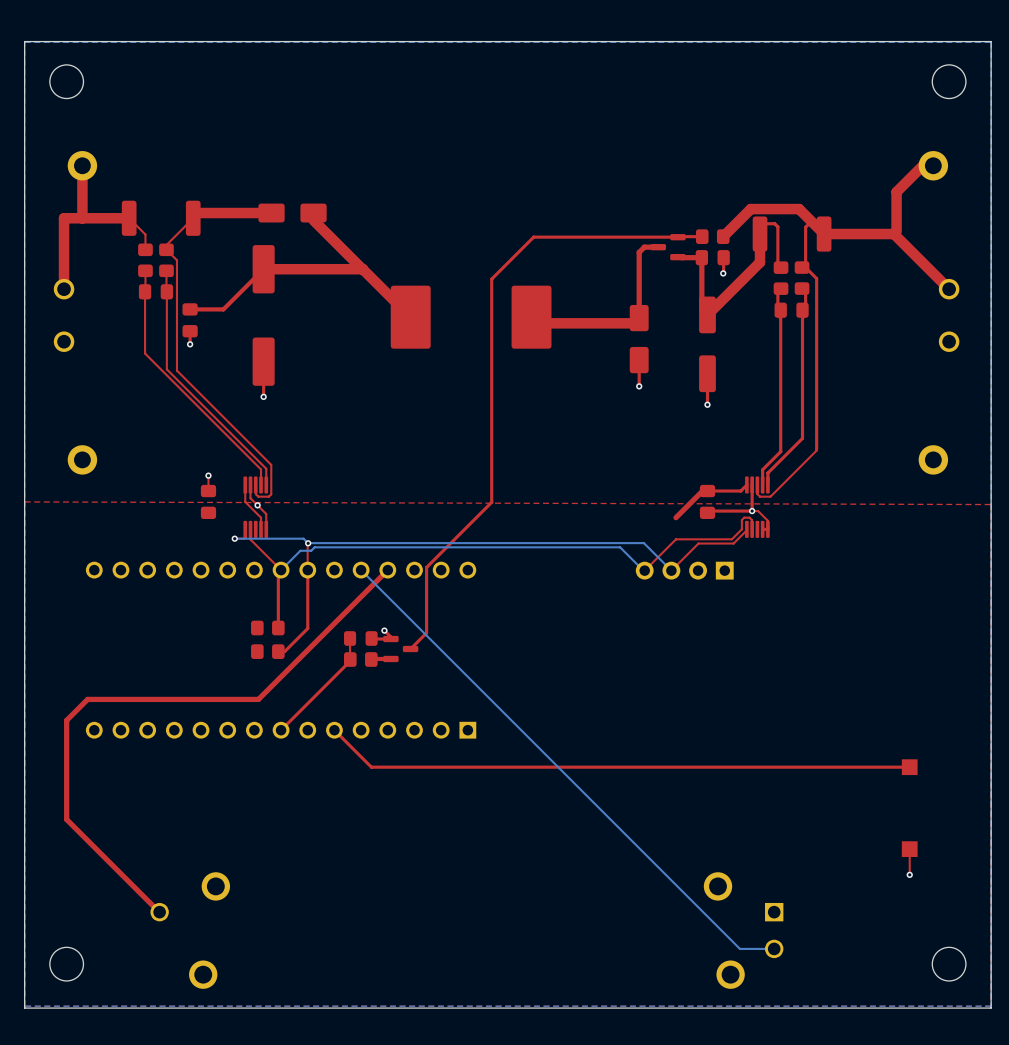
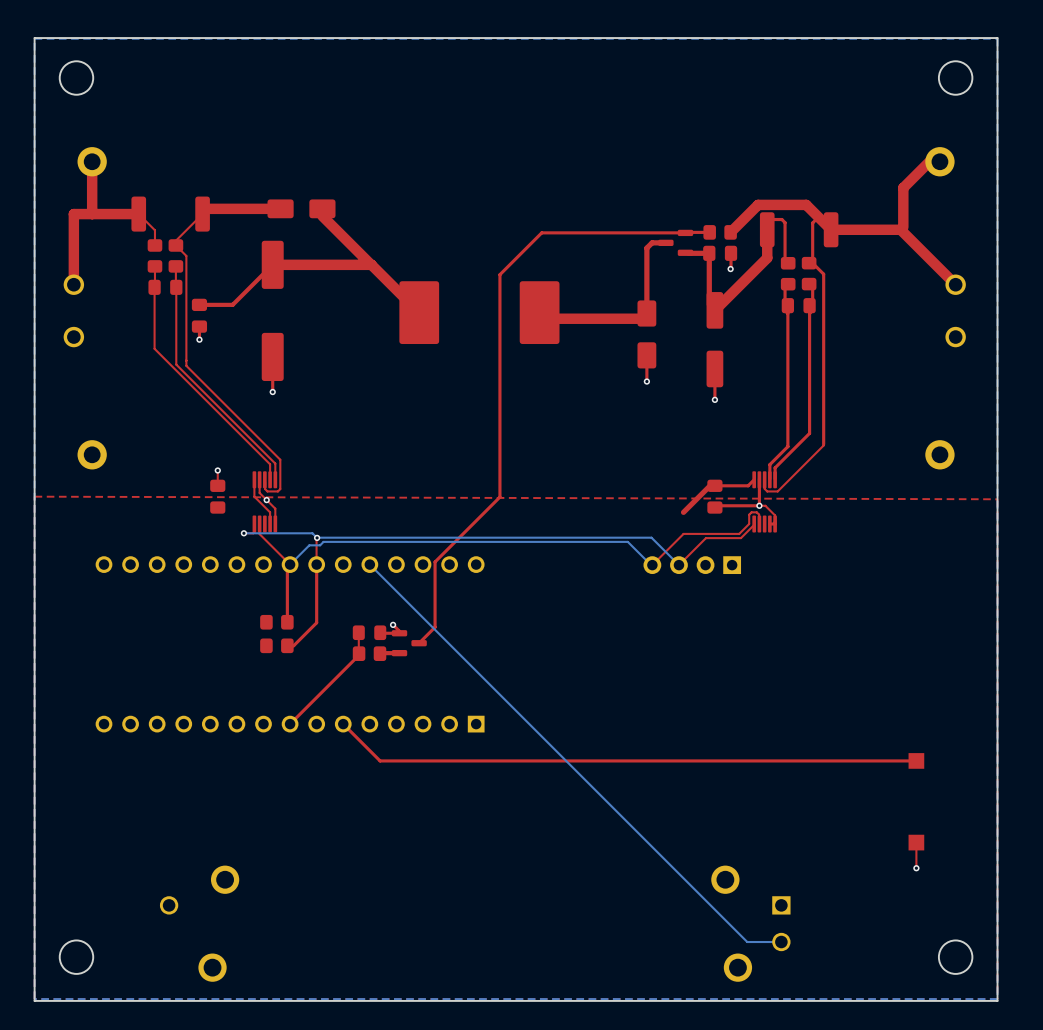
top track: (387, 570) (258, 699) (87, 699) (66, 720) (66, 819) (161, 914) -> none

